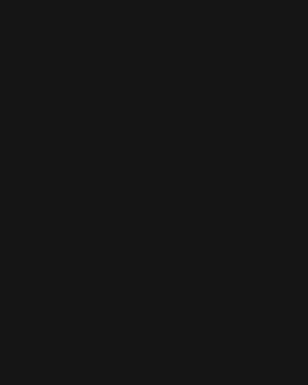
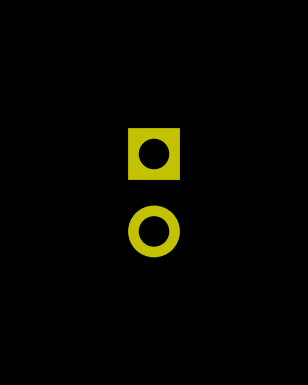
part: none -> (154, 192)

